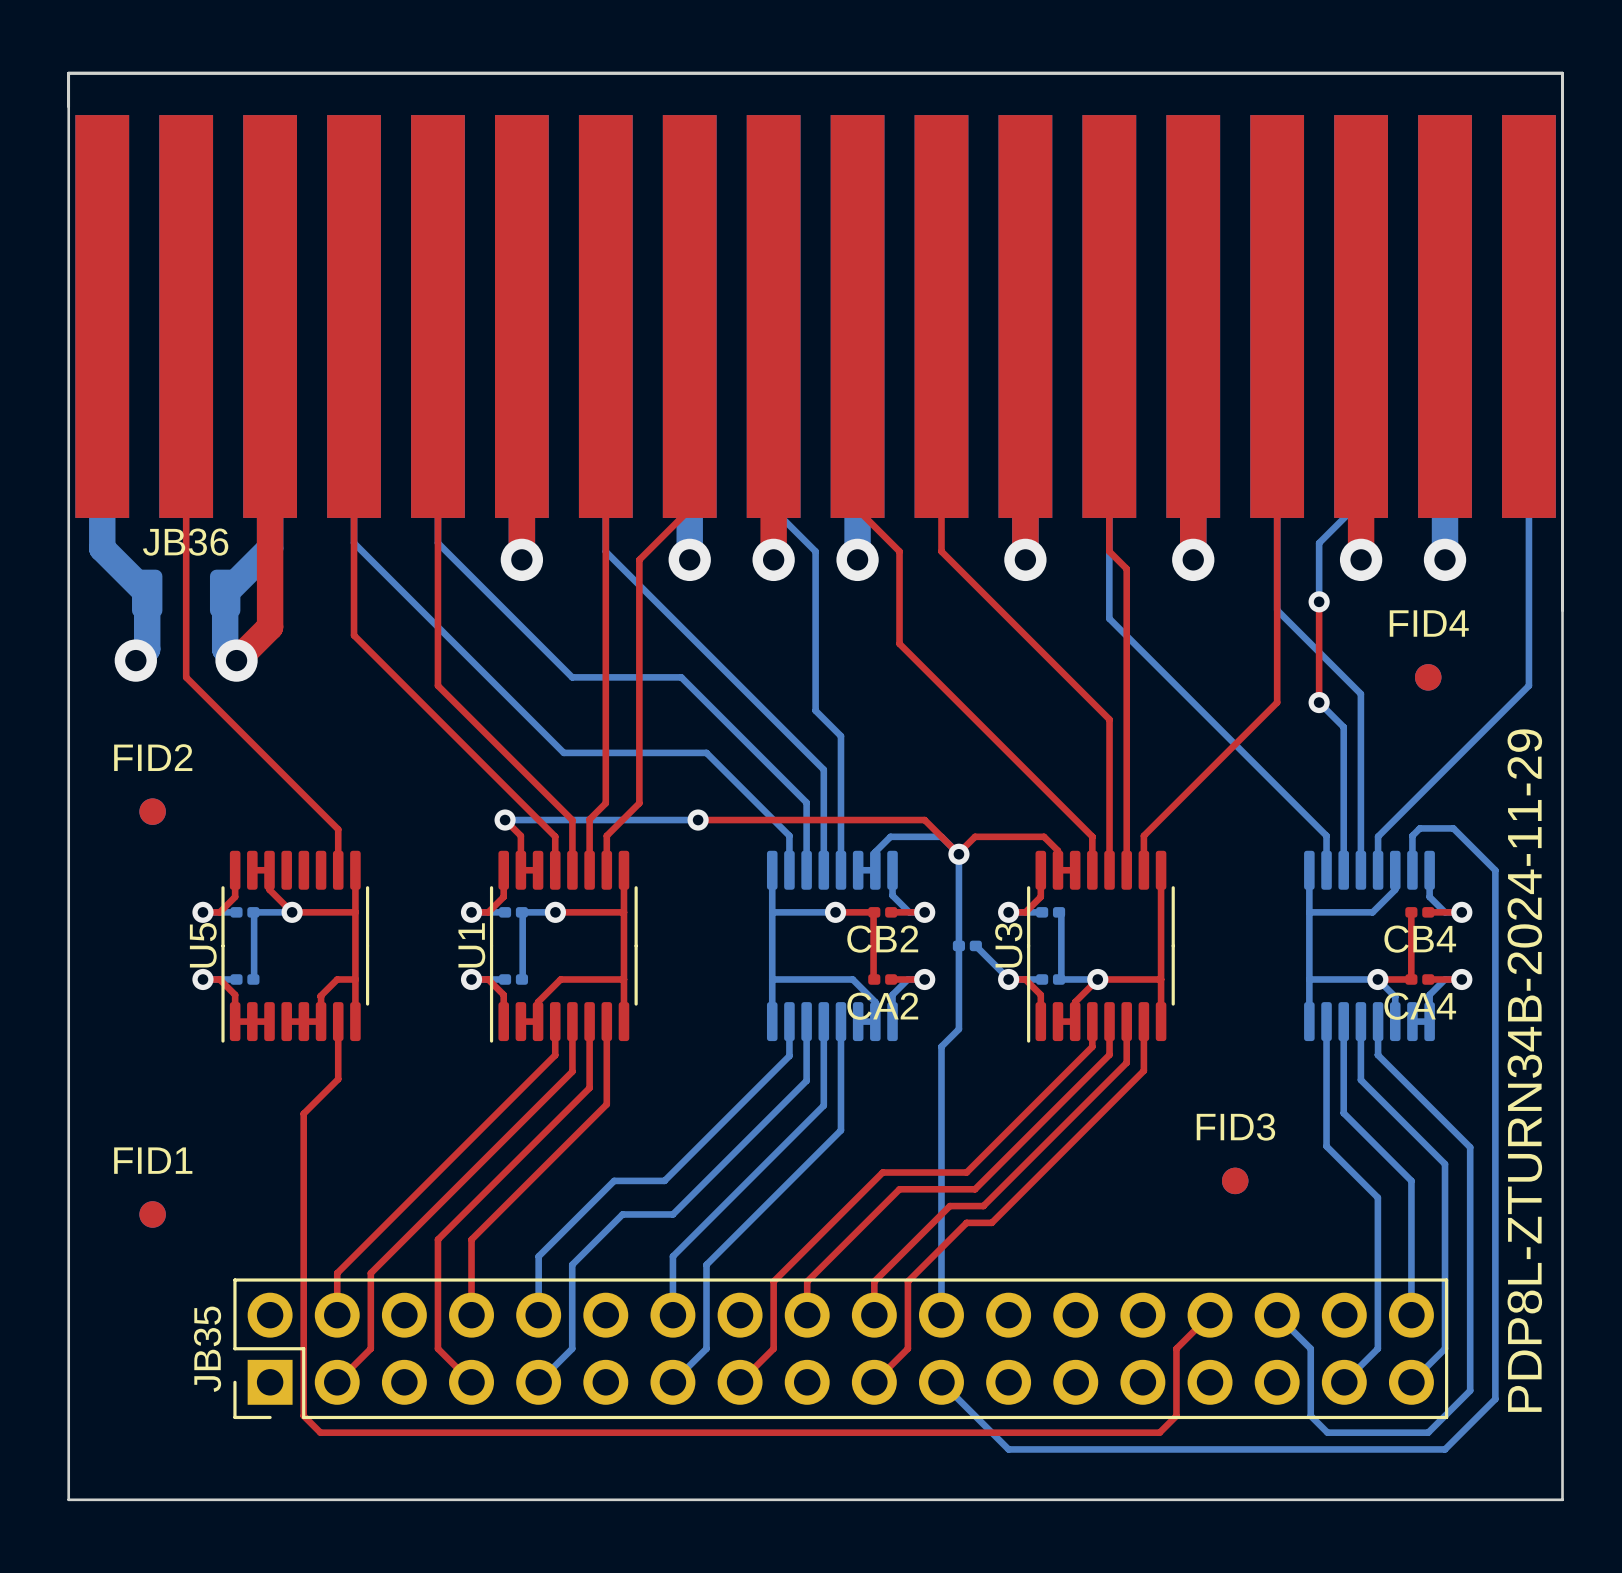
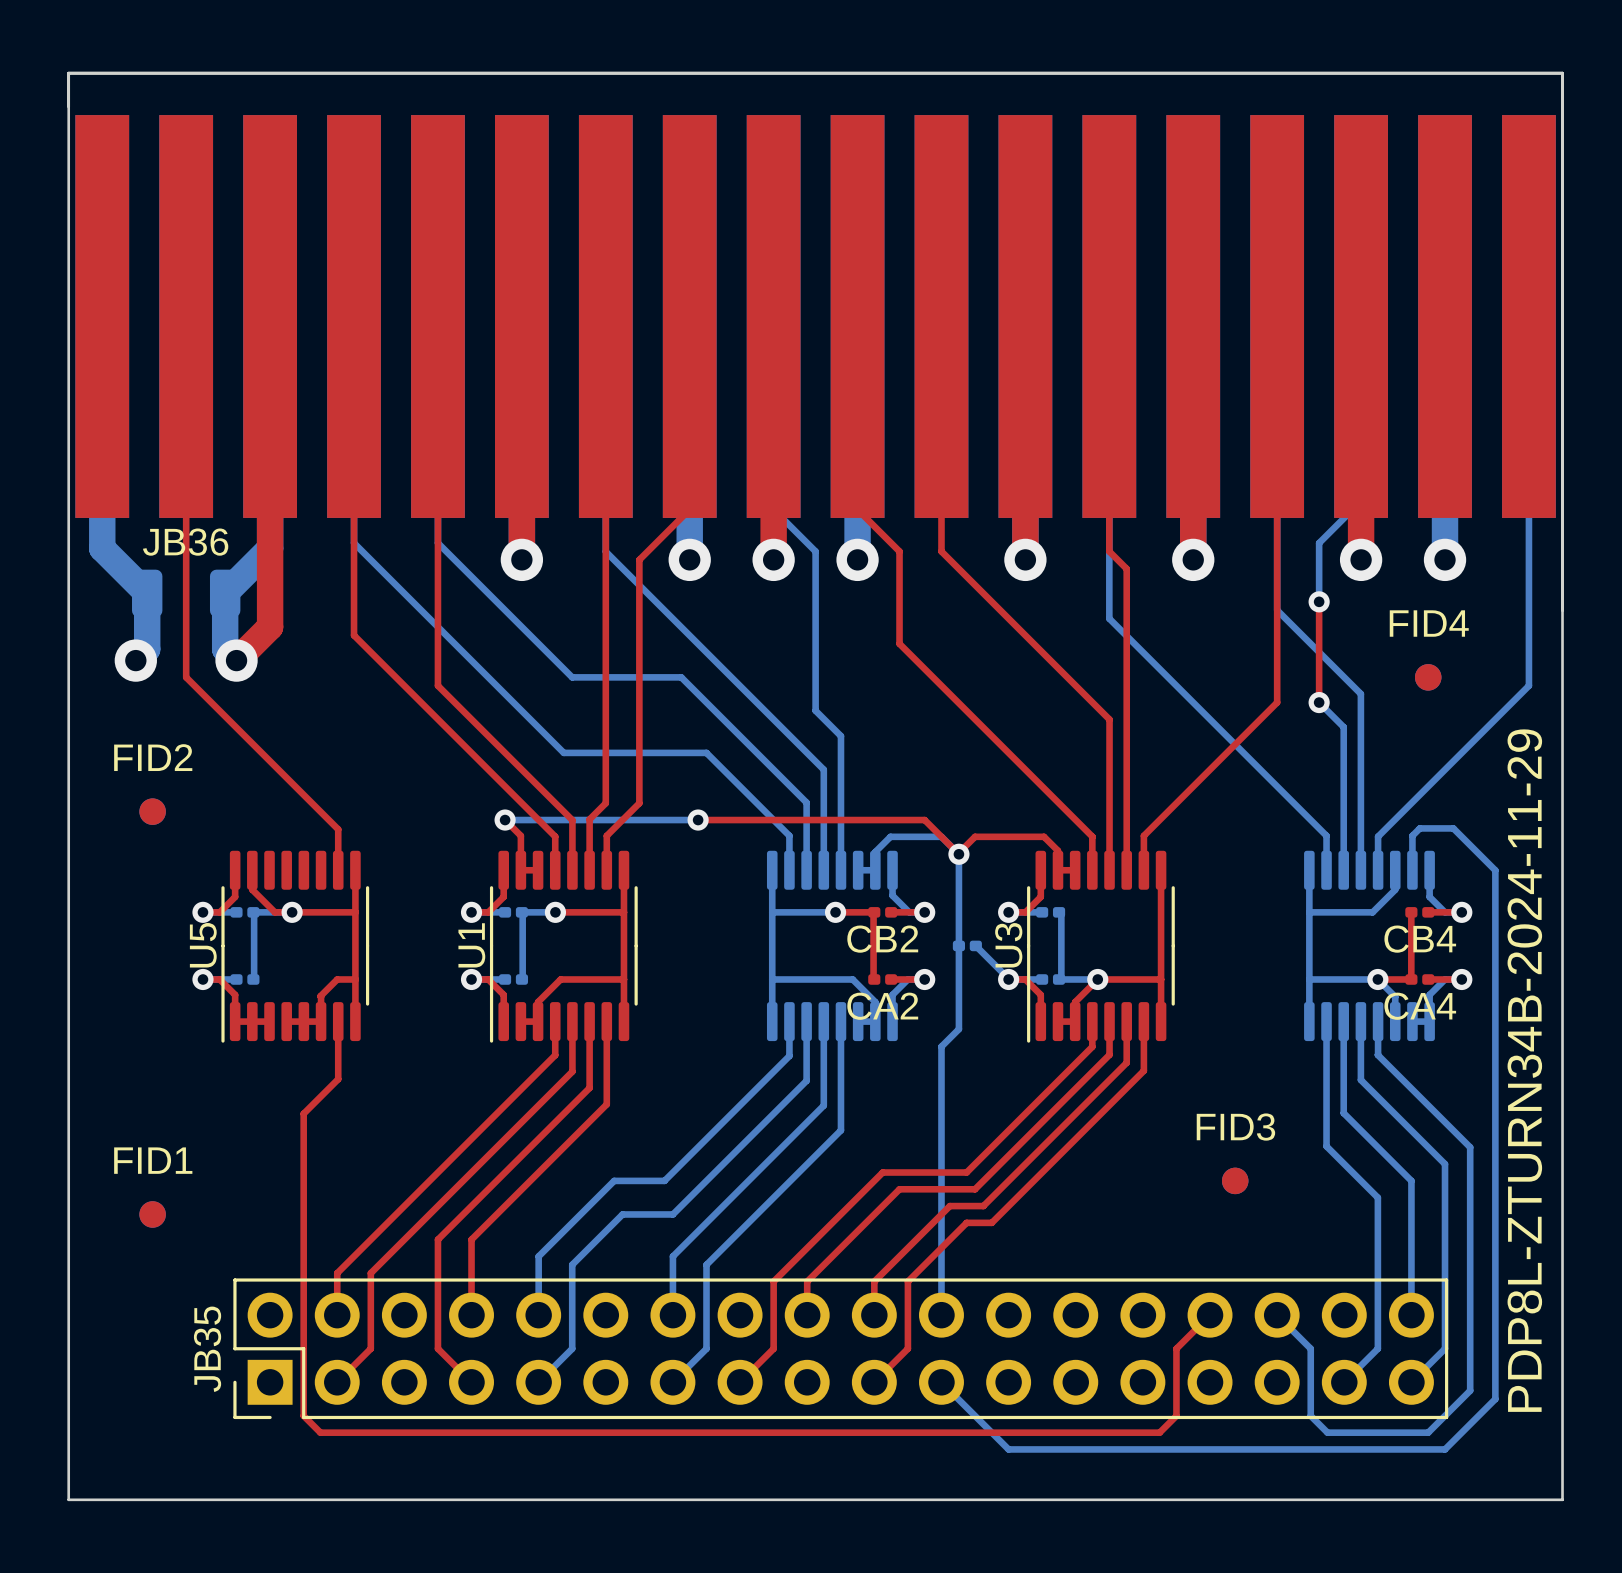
top track: (252, 870) (269, 870) (269, 889) (292, 912) -> (252, 870) (252, 889) (274, 912) (292, 912)

